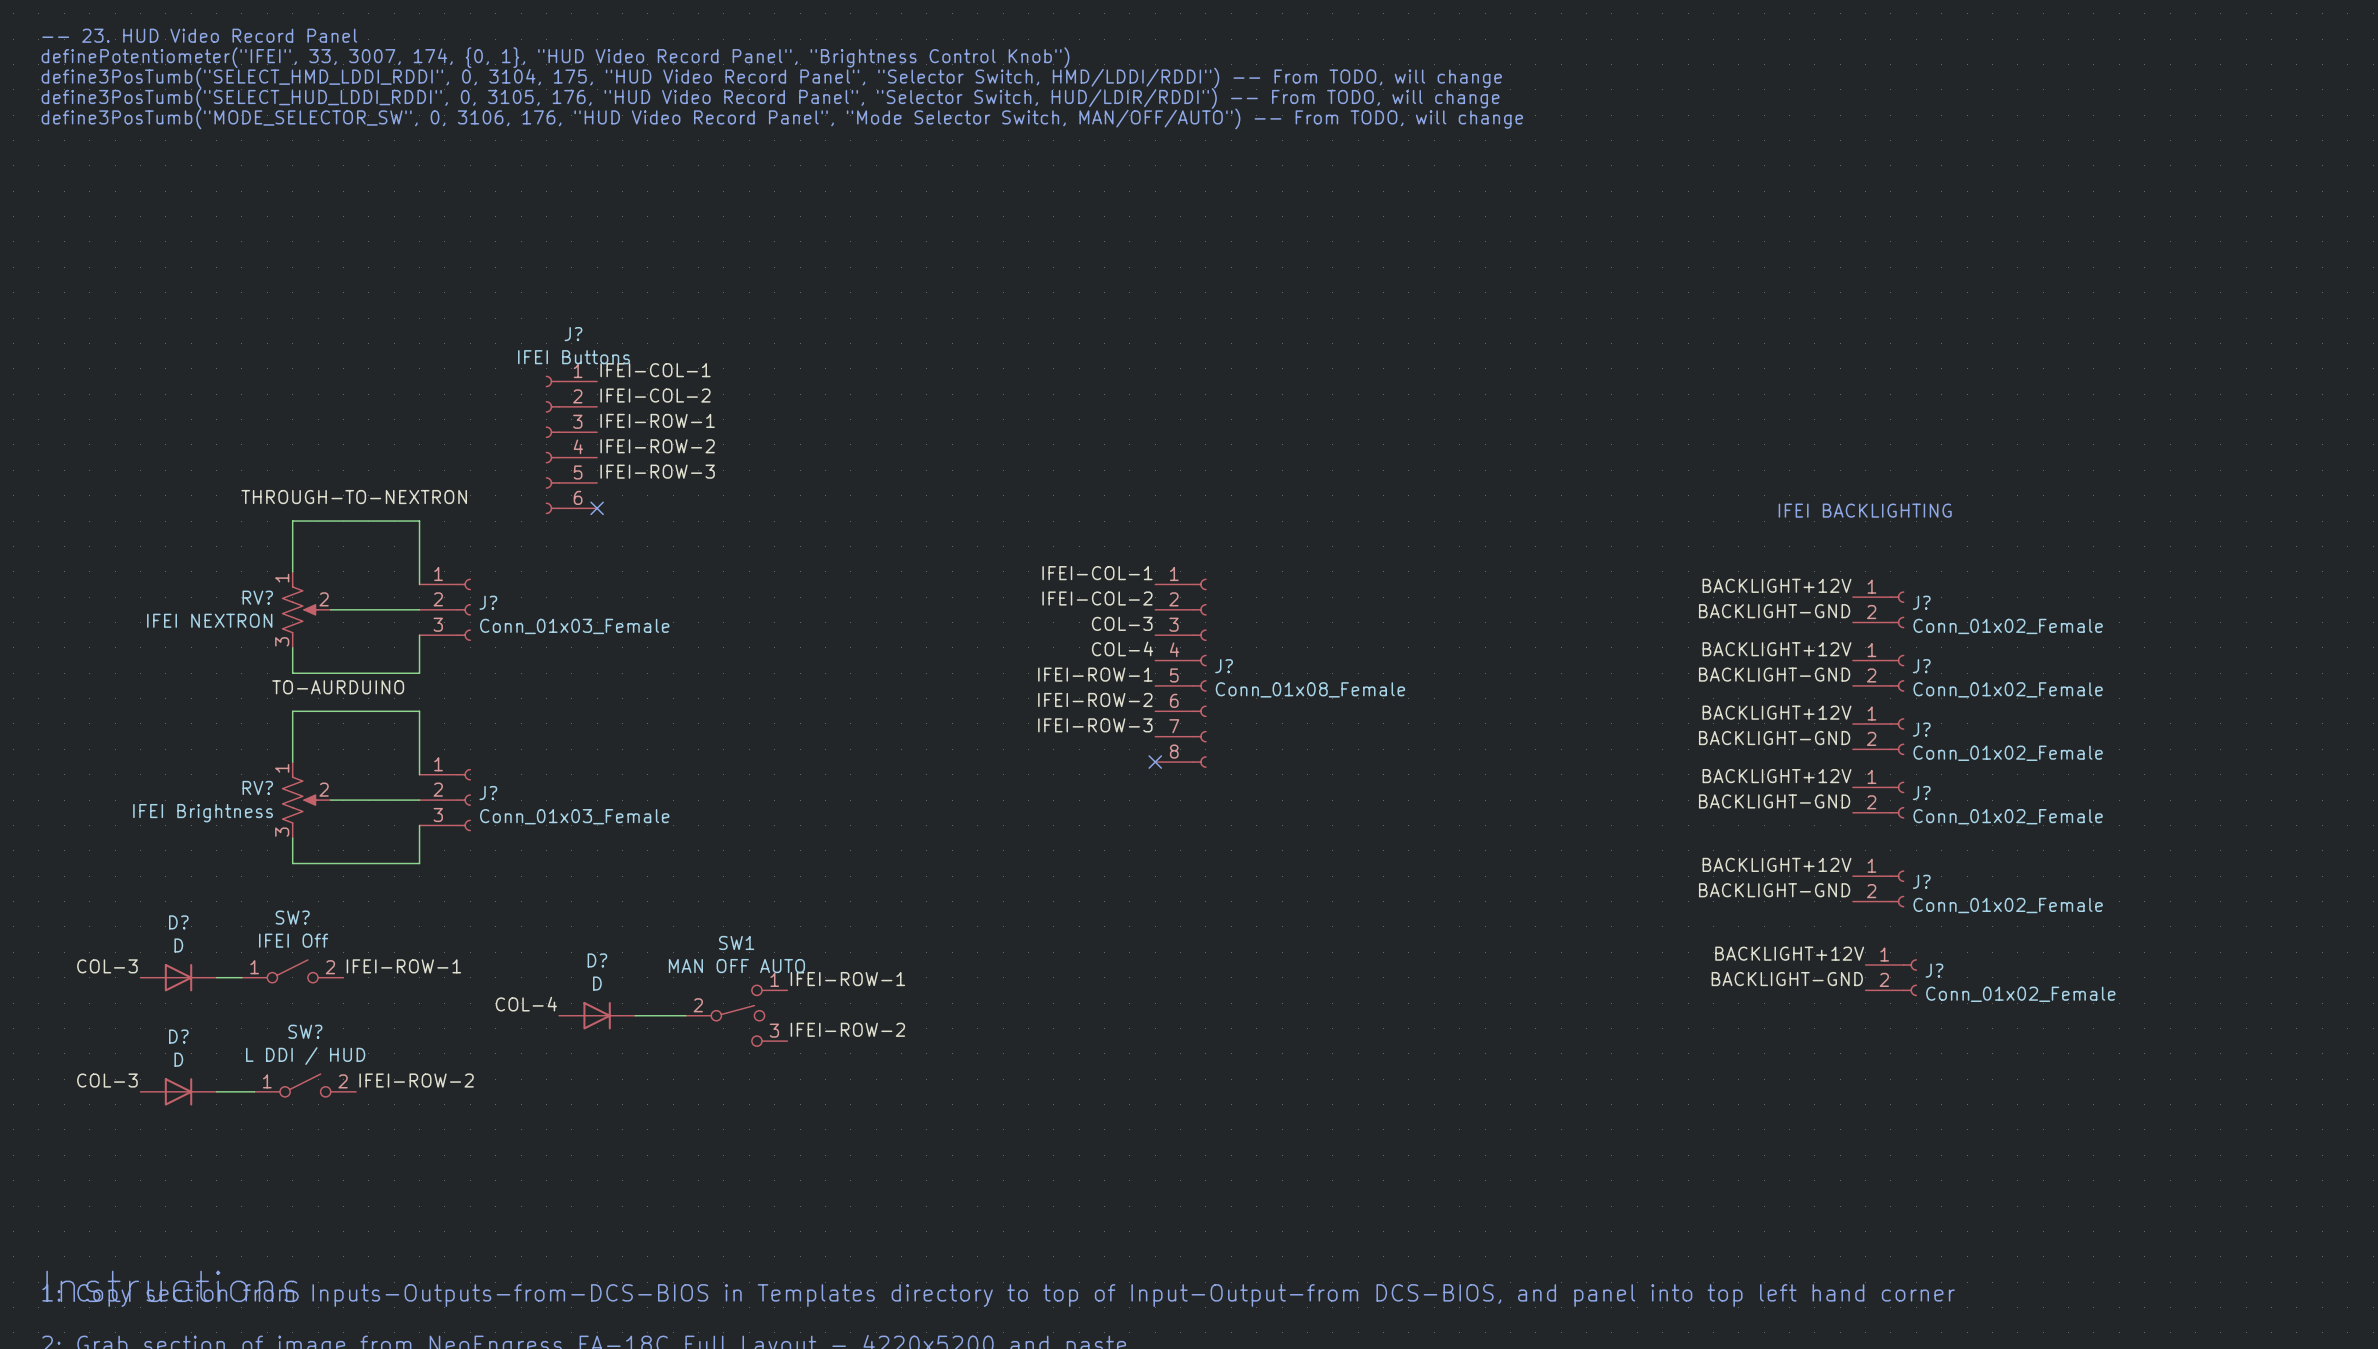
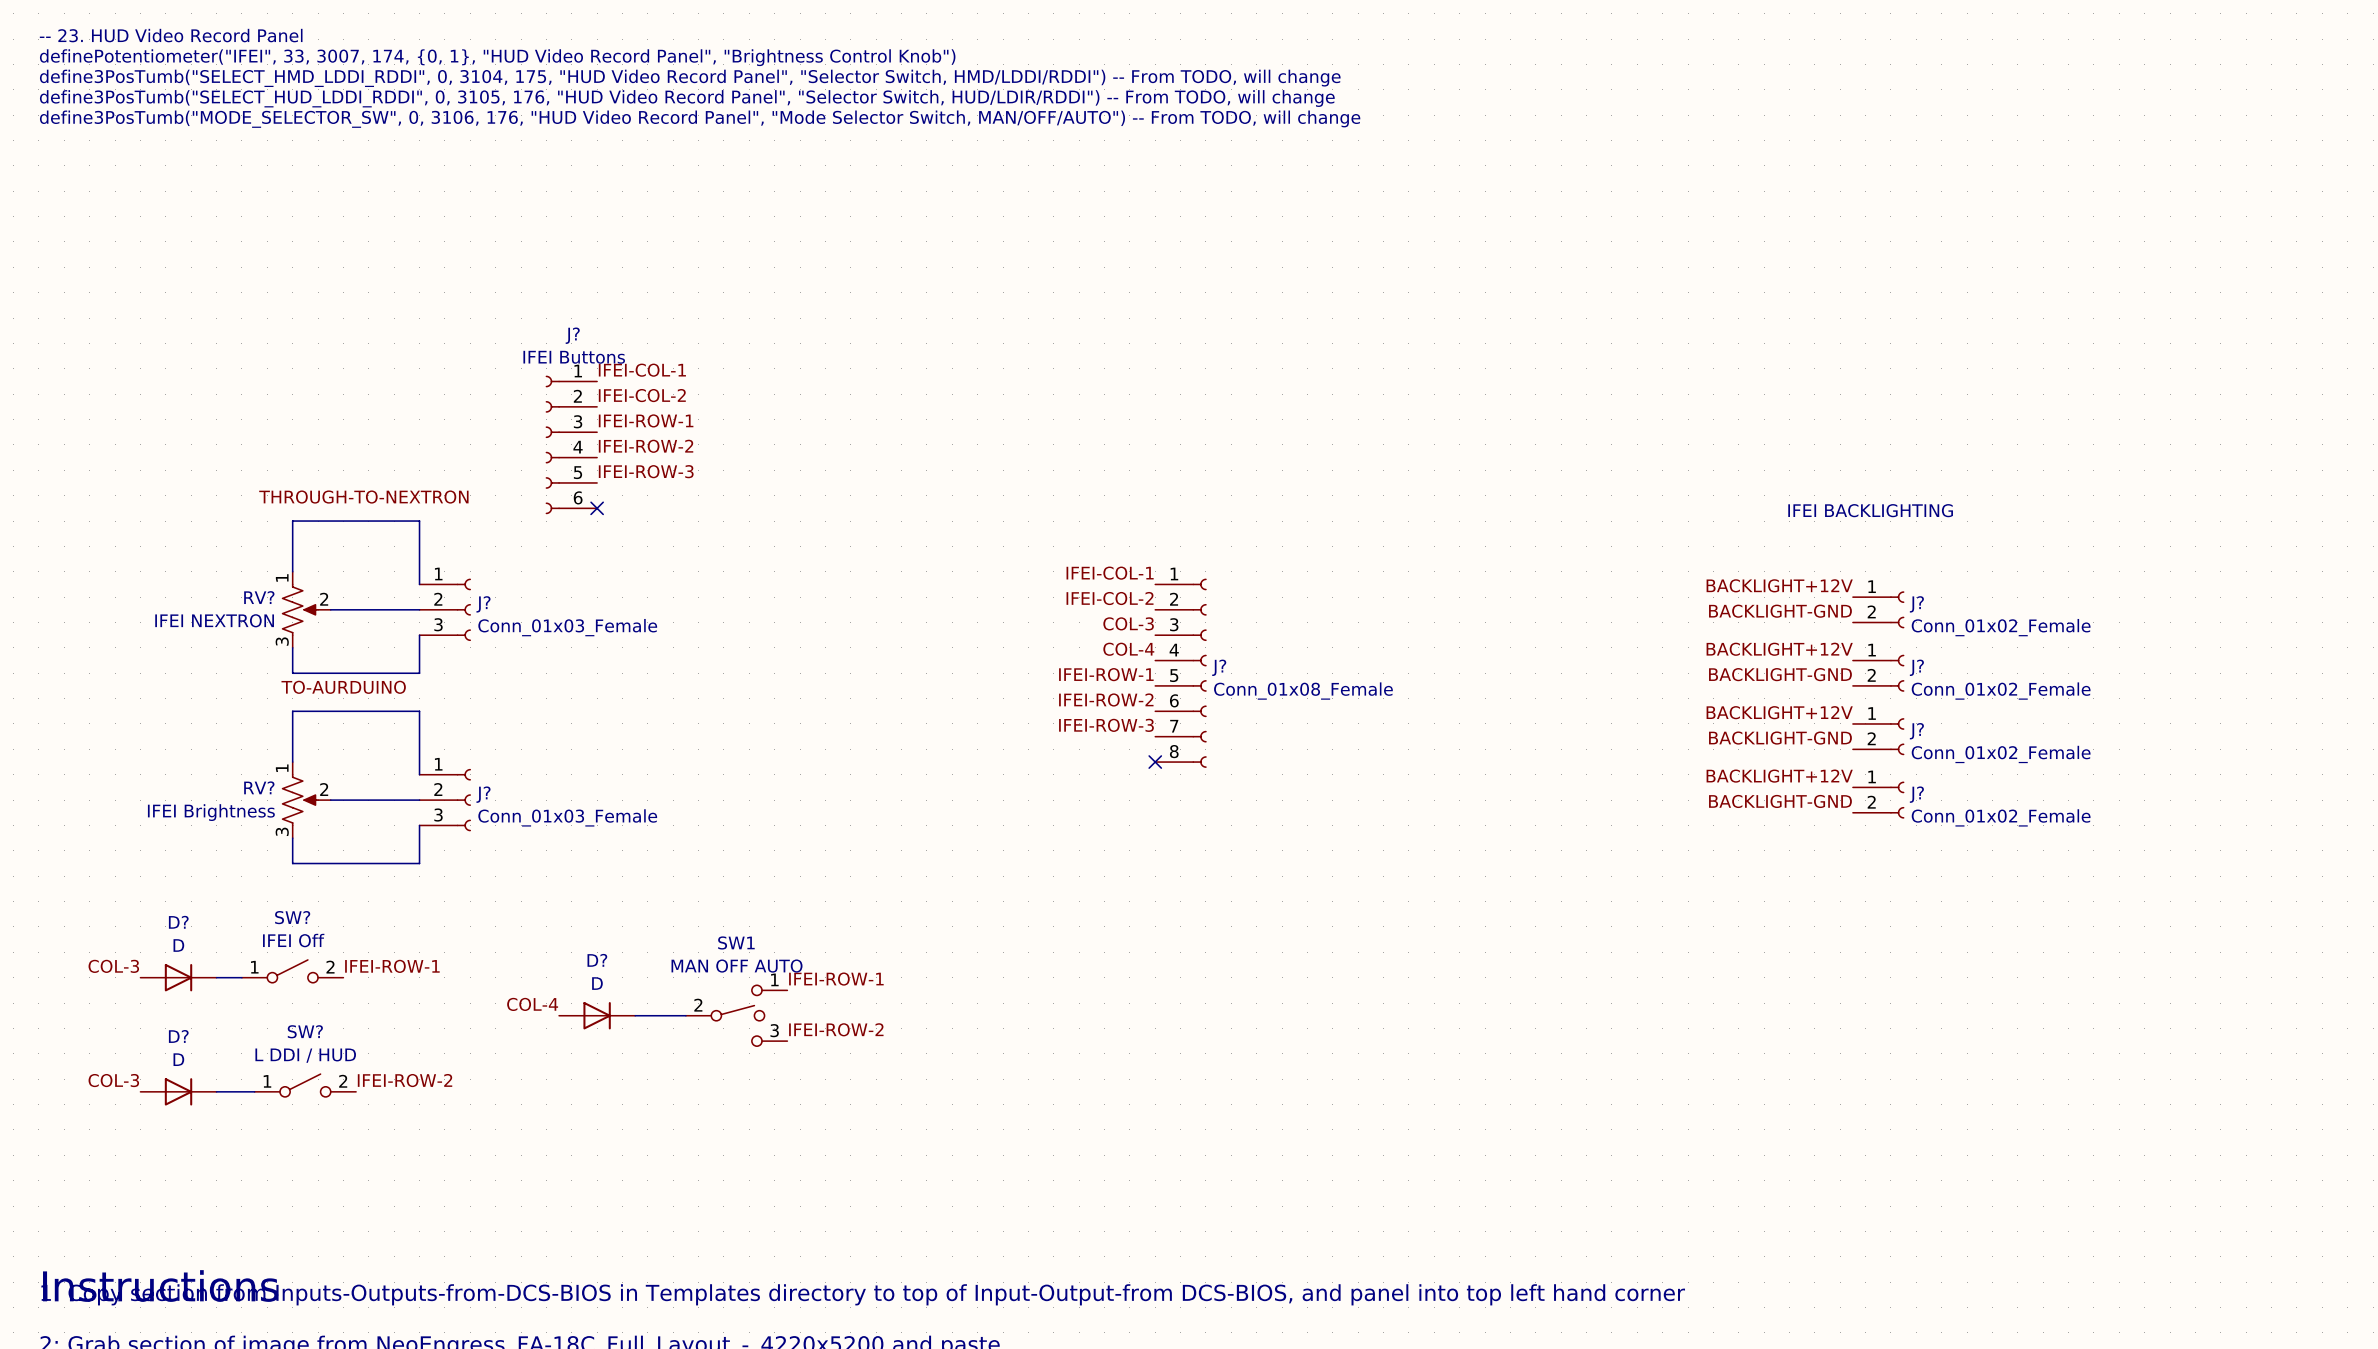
label: BACKLIGHT+12V (1777, 864) -> none
J?: Conn_01x02_Female (1878, 888) -> none
label: BACKLIGHT-GND (1774, 890) -> none
label: BACKLIGHT+12V (1789, 953) -> none
J?: Conn_01x02_Female (1891, 977) -> none
label: BACKLIGHT-GND (1787, 979) -> none

